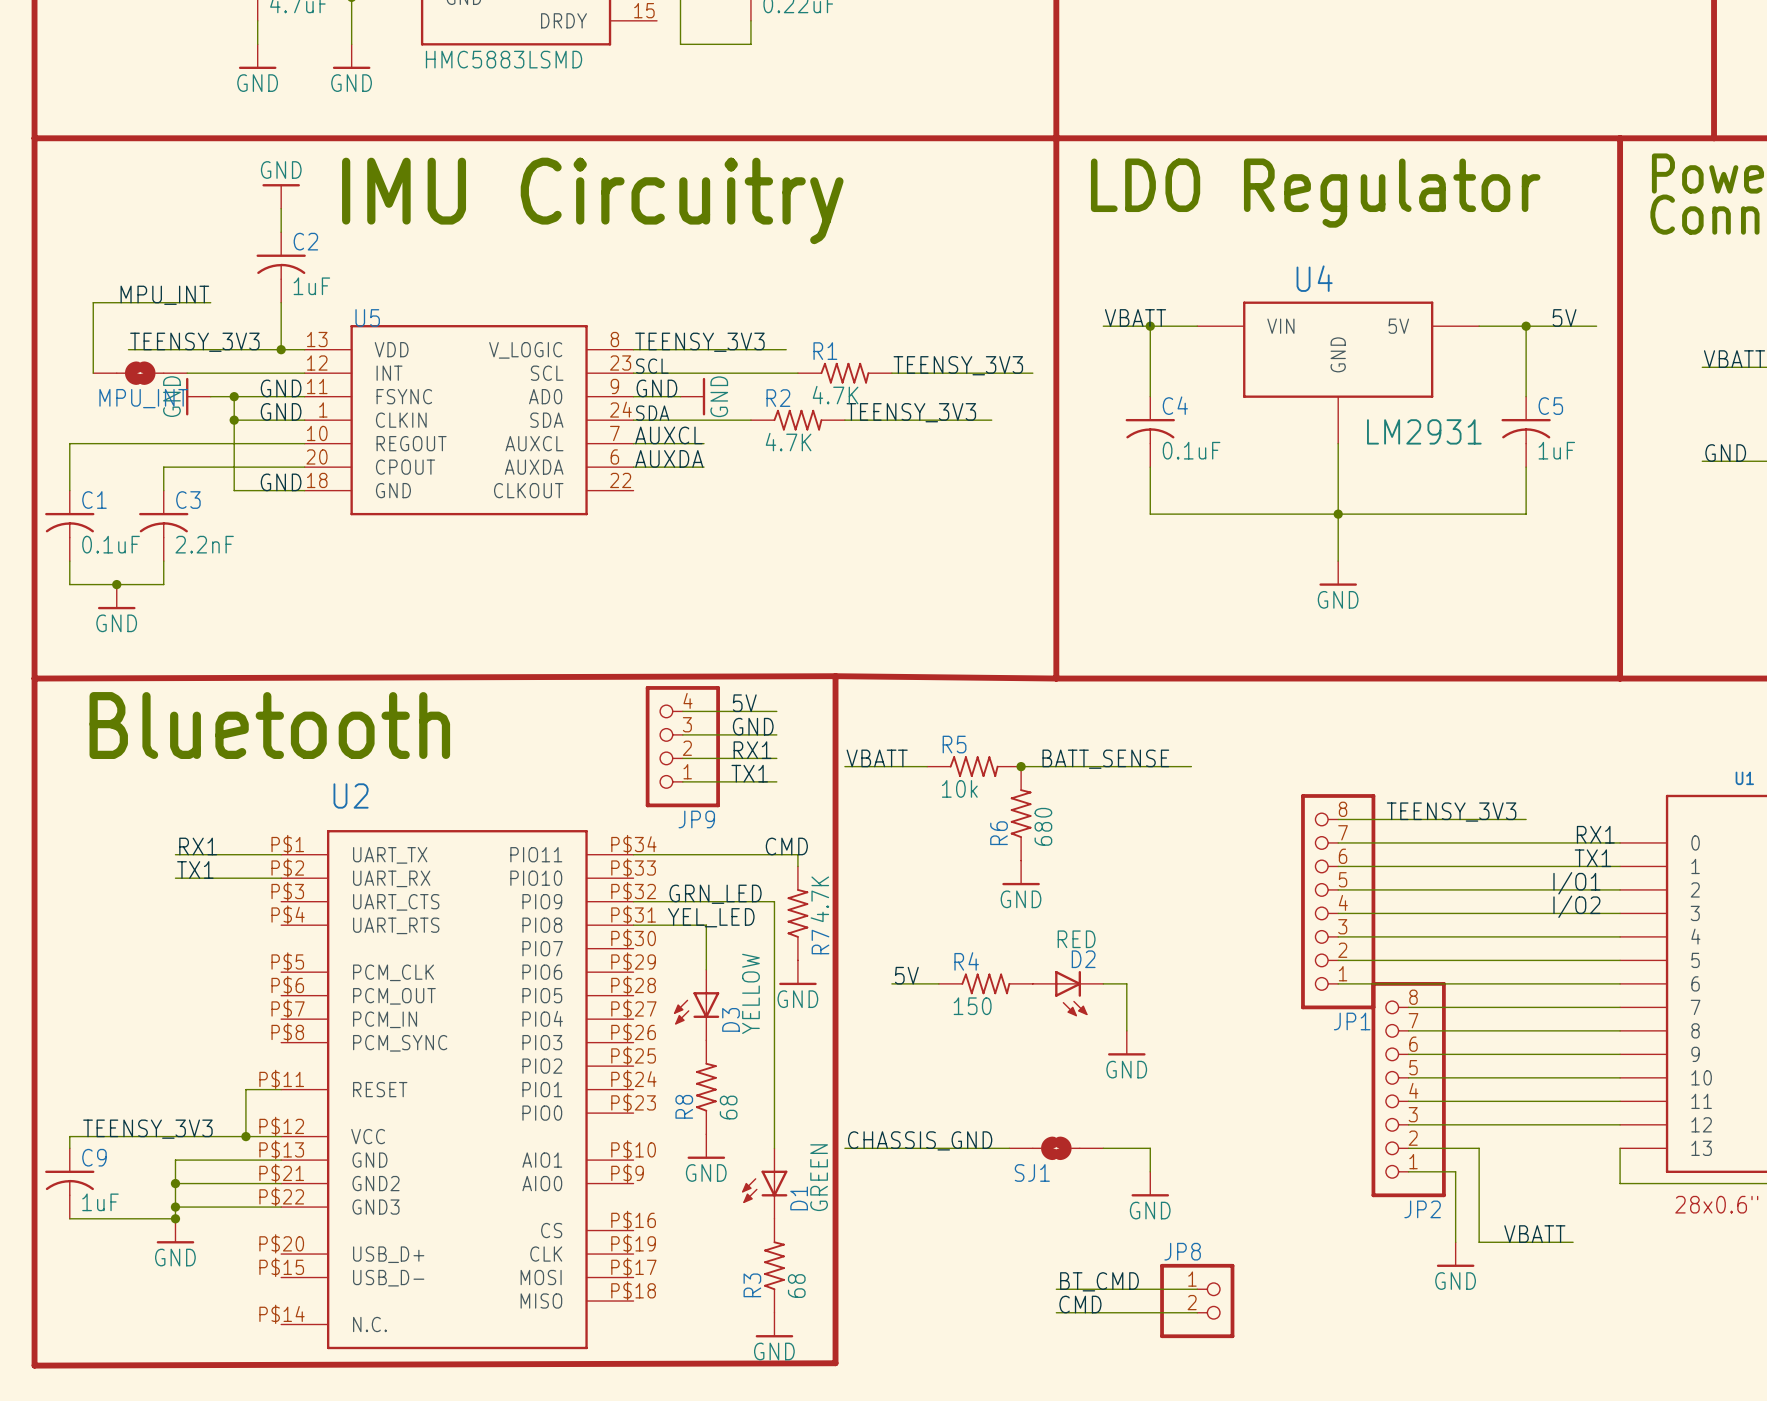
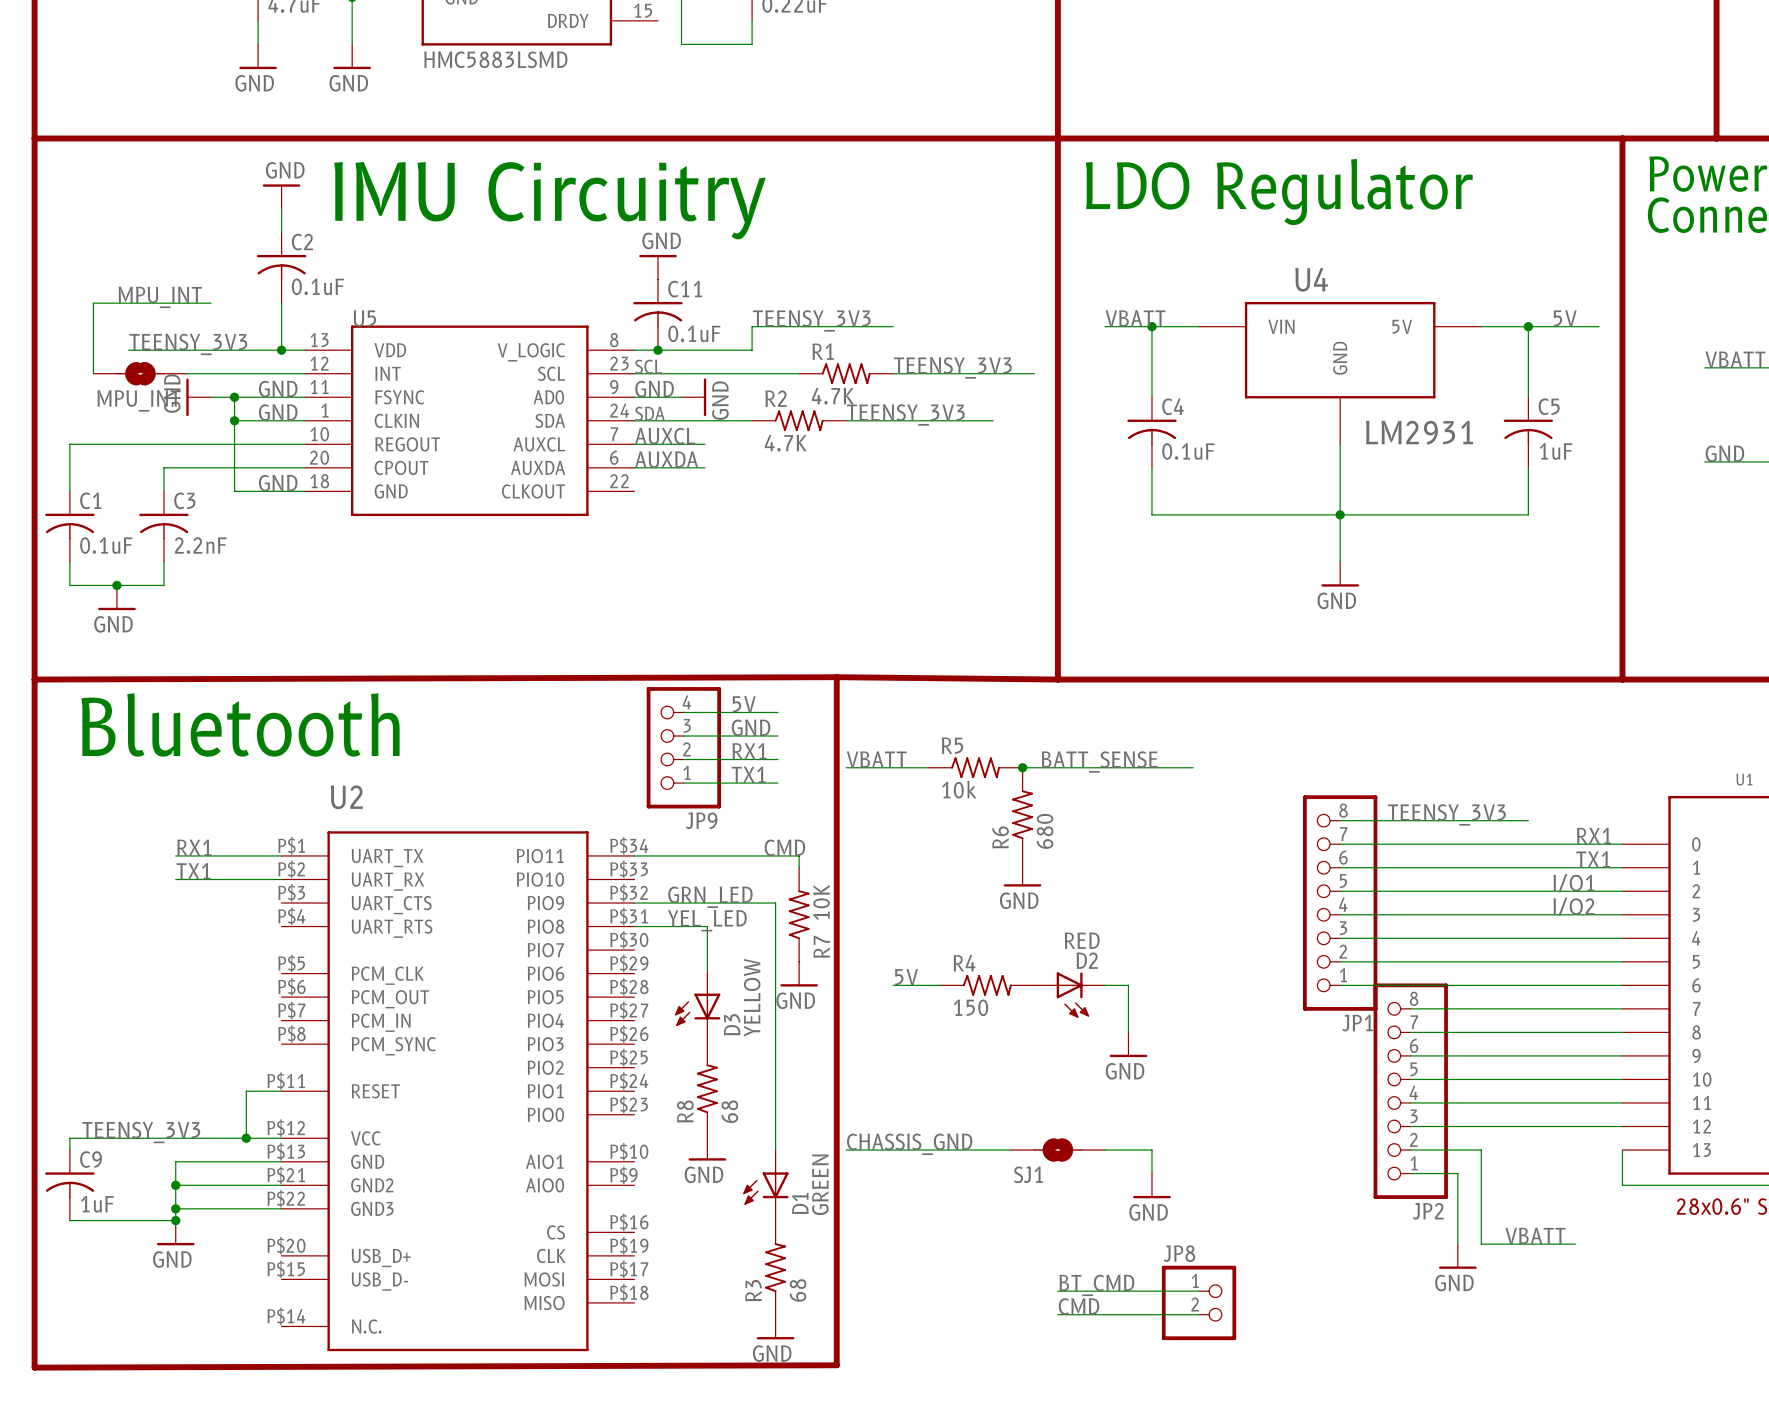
power symbol: none -> GND (657, 267)
C2 value: 1uF (311, 286) -> 0.1uF (317, 286)
C11: none -> 0.1uF (657, 314)
label position: TEENSY_3V3 (699, 342) -> TEENSY_3V3 (811, 320)
junction: none -> (657, 350)
wire: (750, 349) (786, 349) -> (752, 350) (752, 326) (893, 326)
R7 value: 4.7K (819, 899) -> 10K (821, 902)

